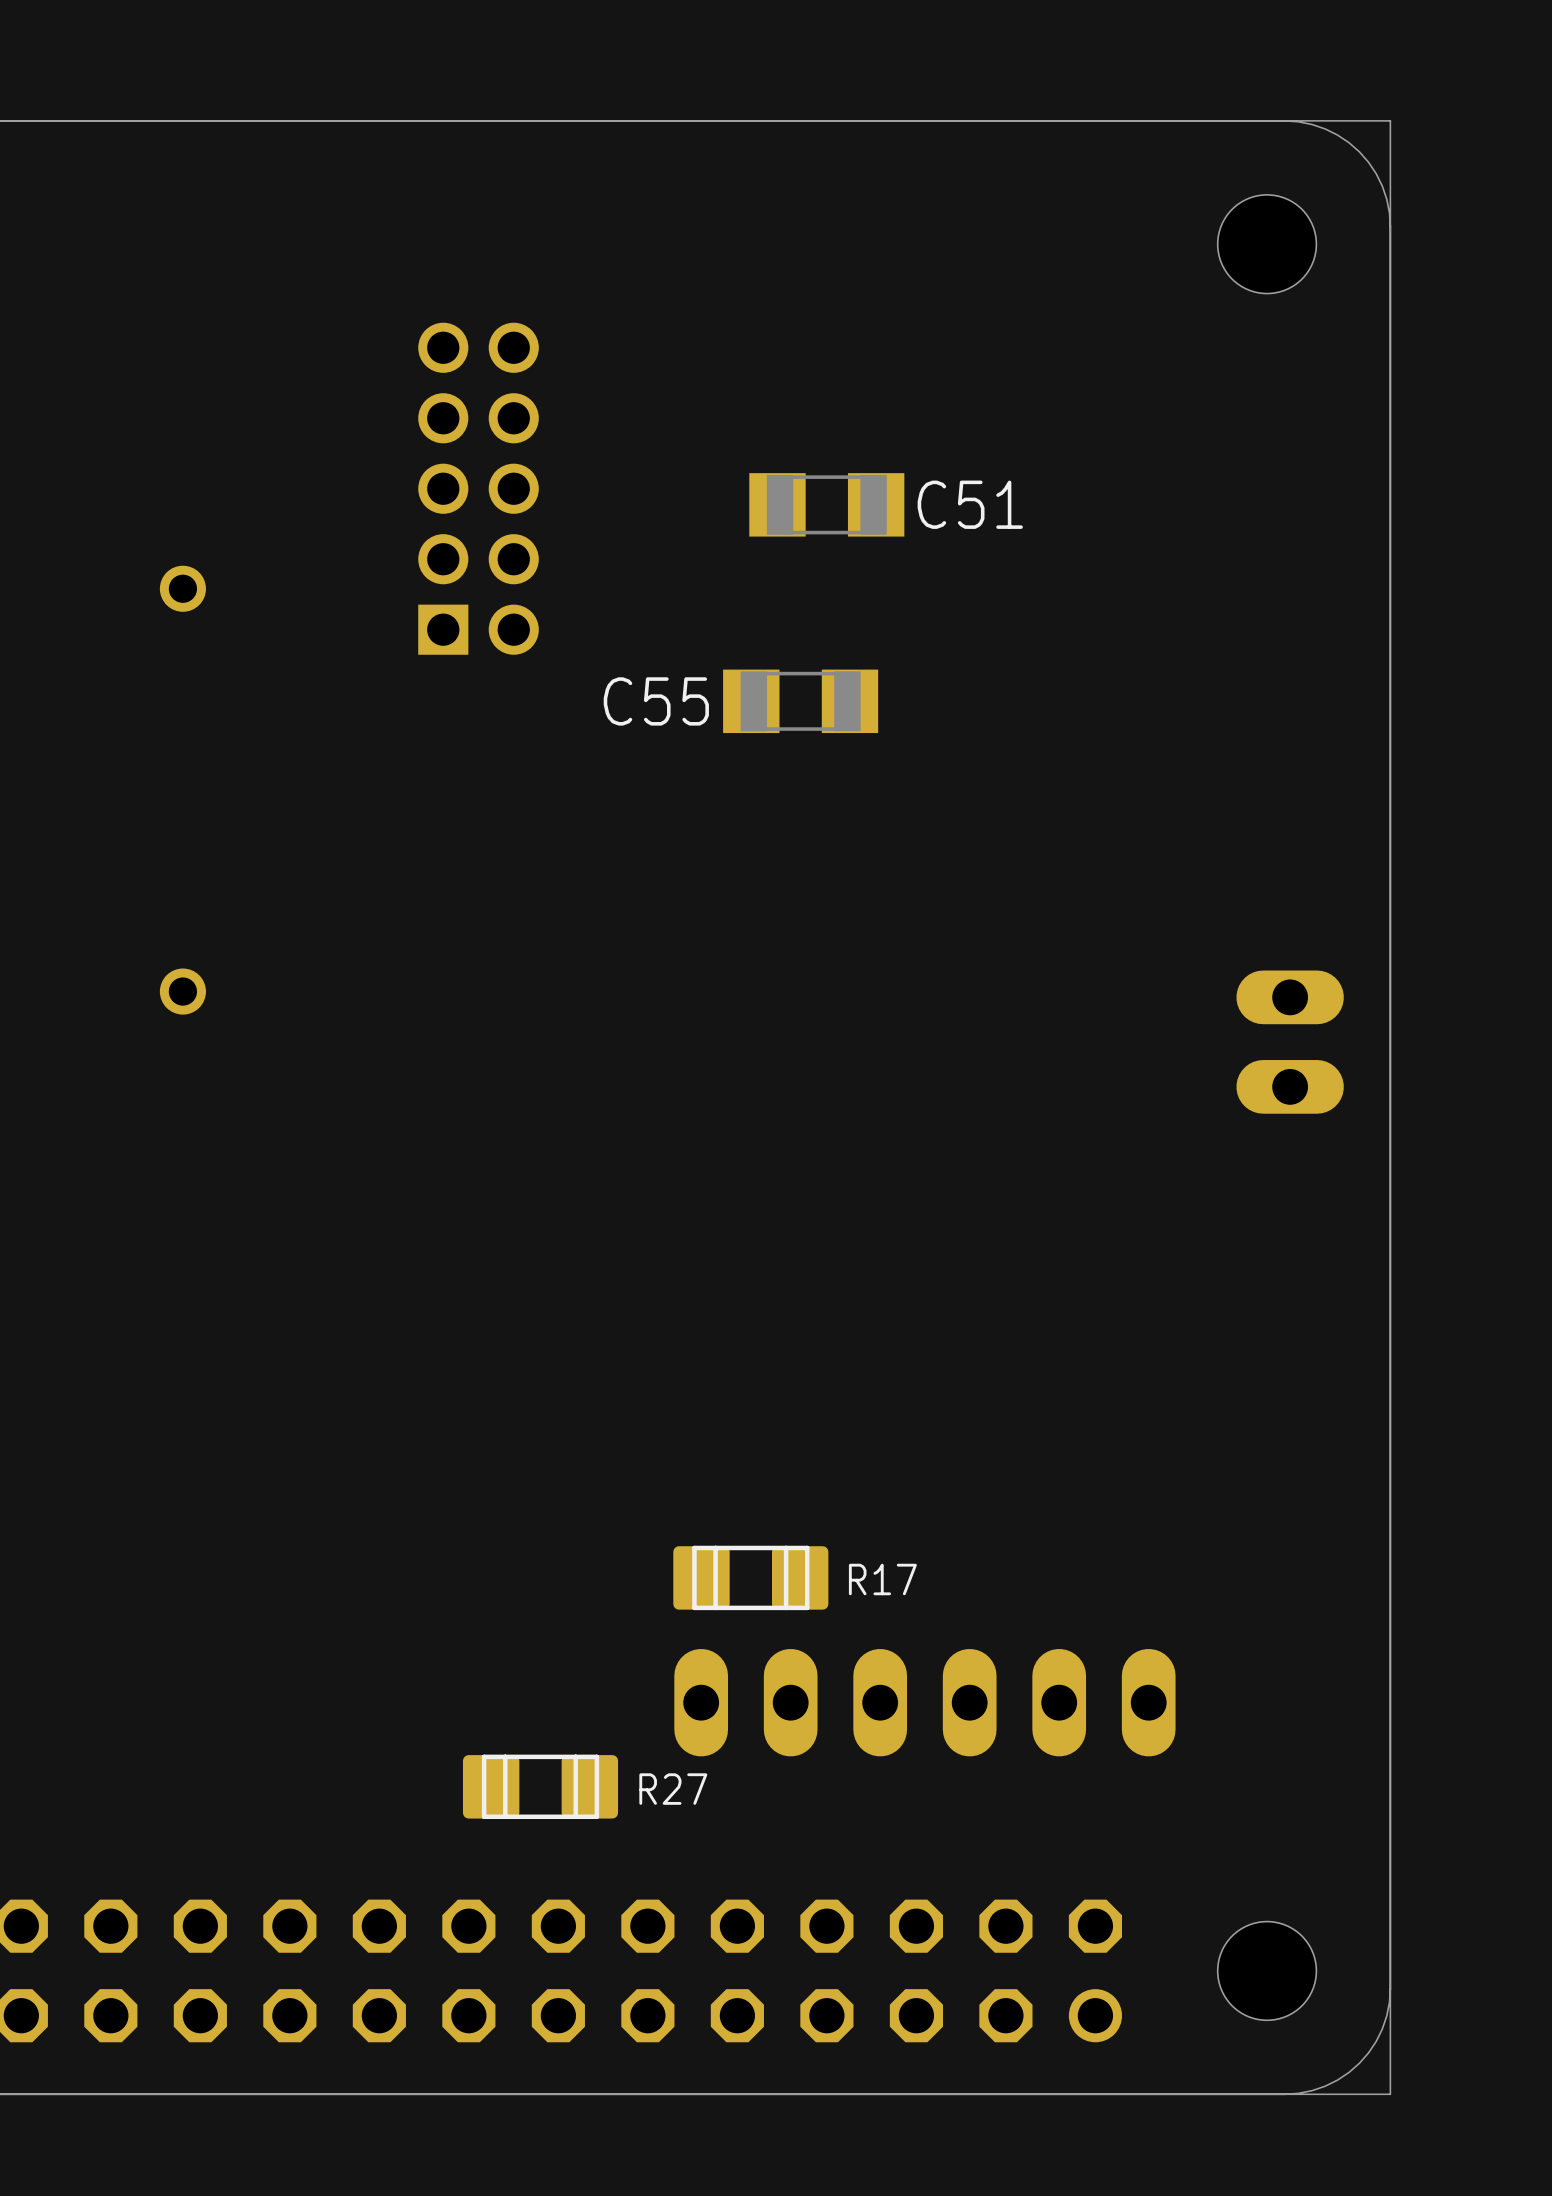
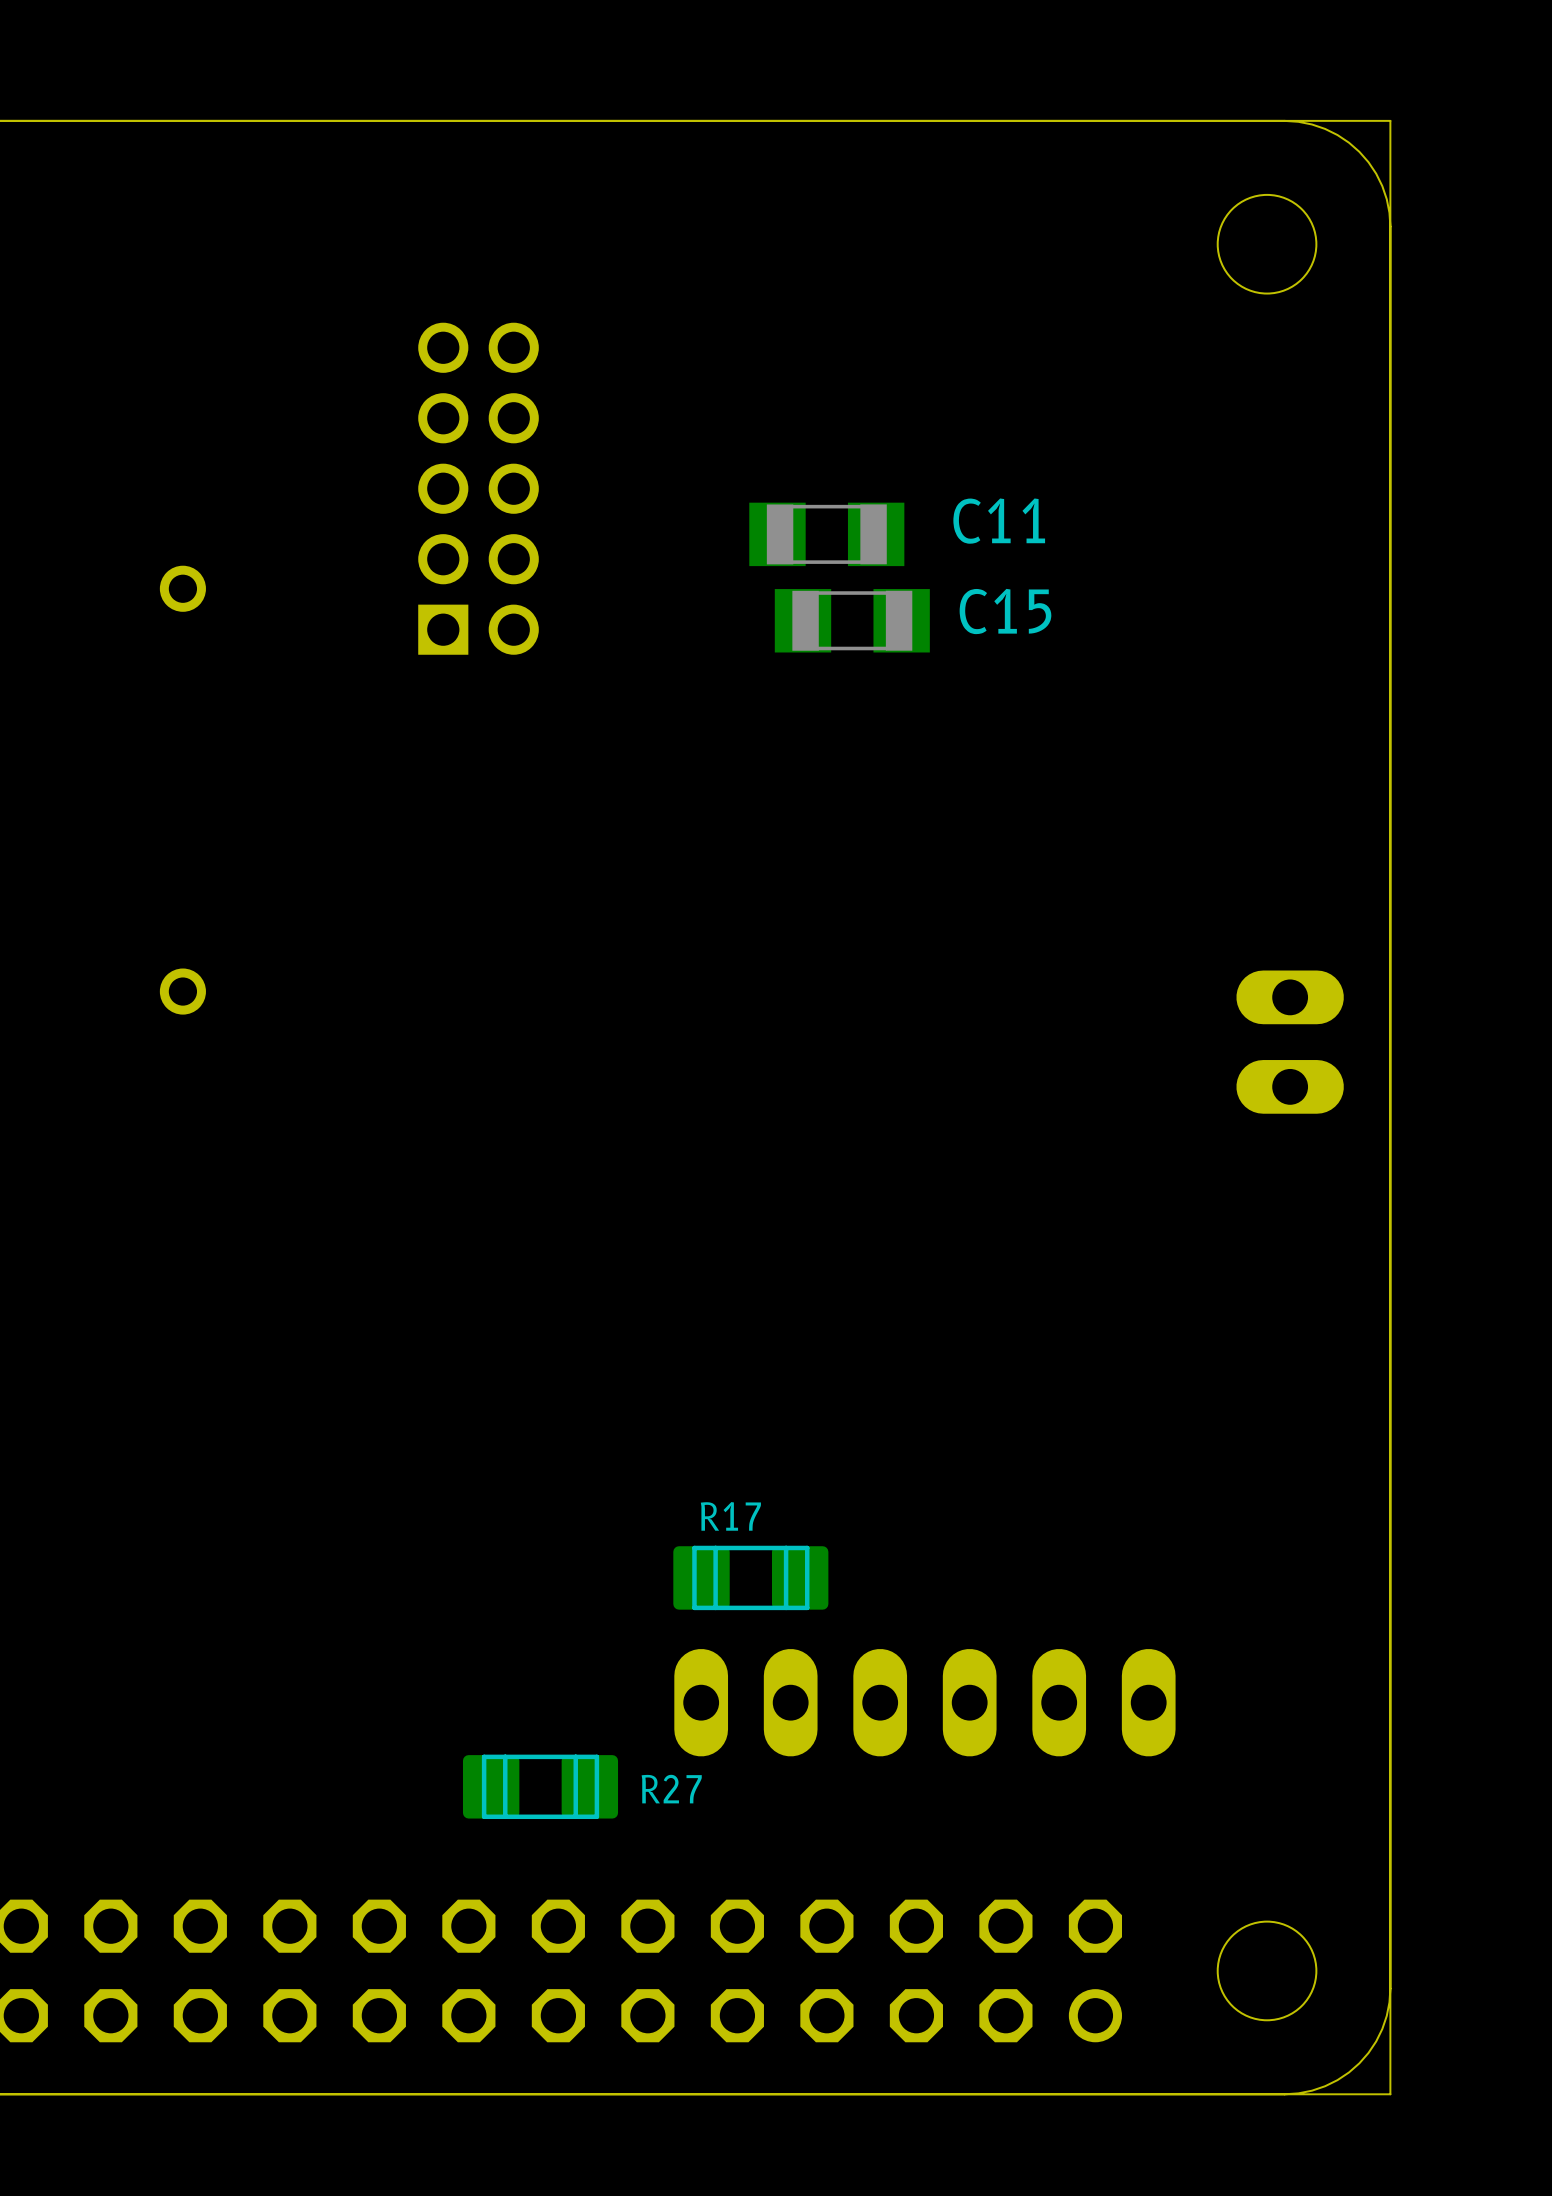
C51 position: (826, 504) -> (826, 534)
C51 name: C51 (970, 504) -> C11 (999, 521)
C15: none -> (852, 620)
C55: (800, 701) -> none
R17 name position: R17 (882, 1579) -> R17 (730, 1516)

